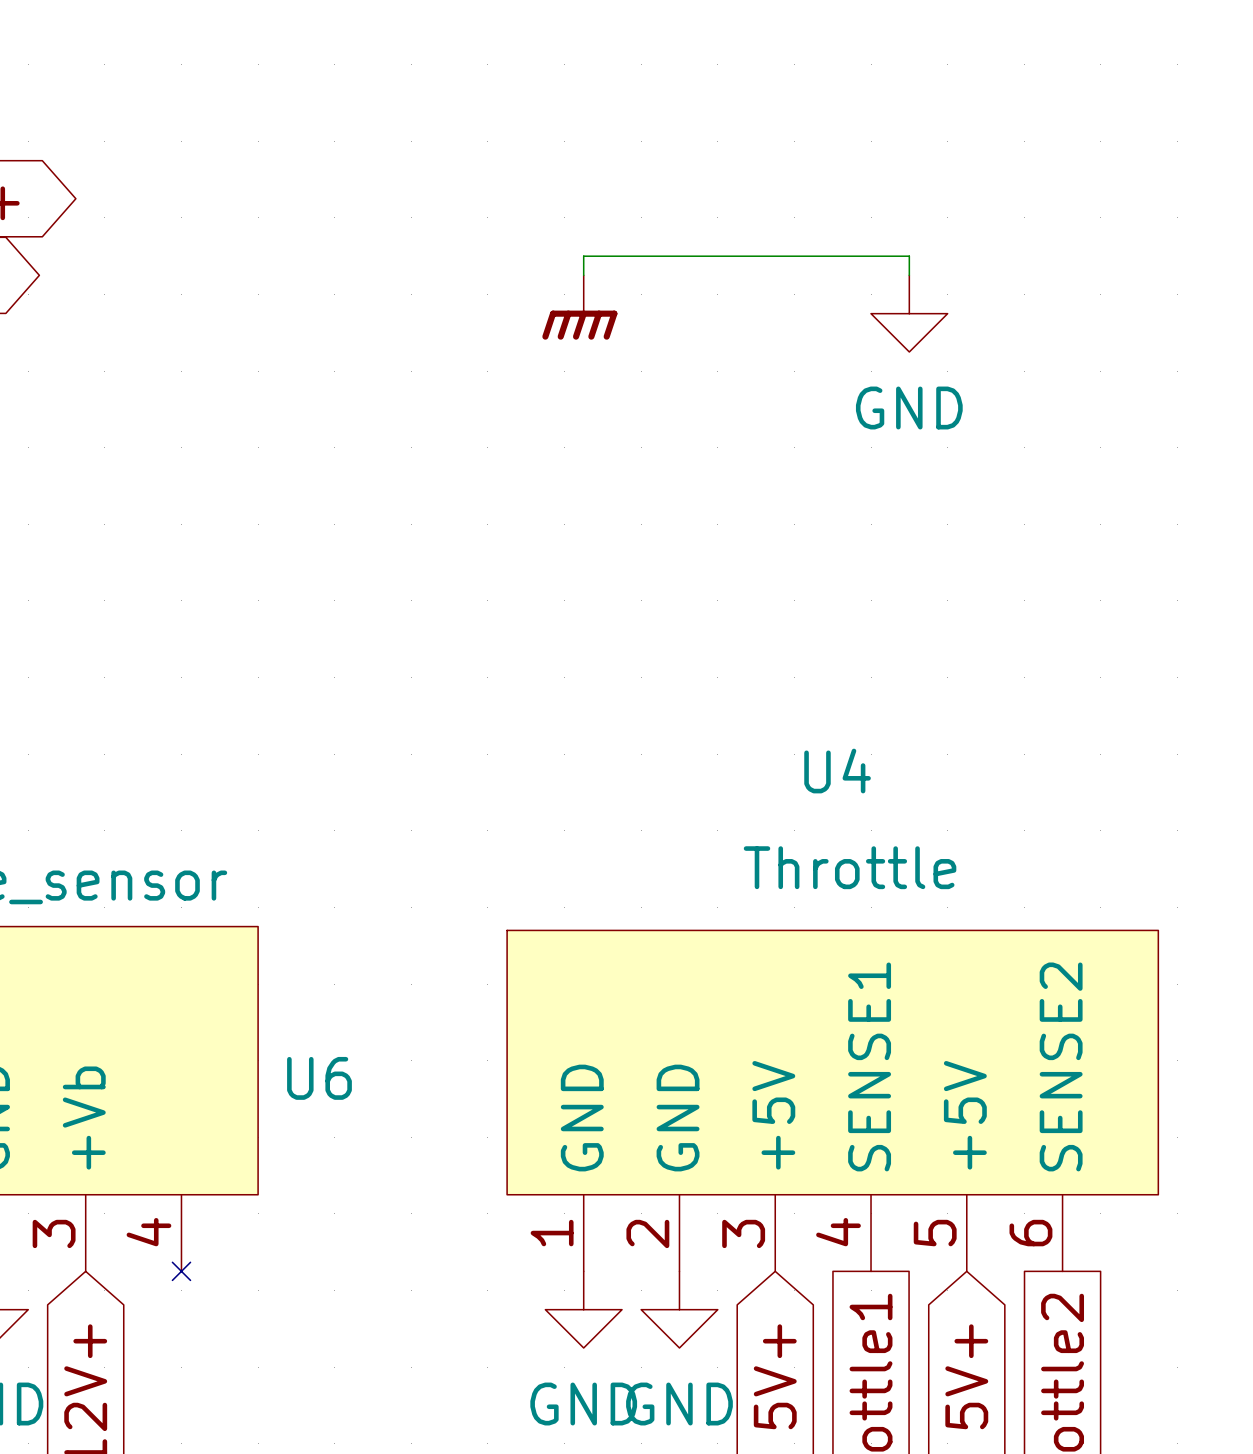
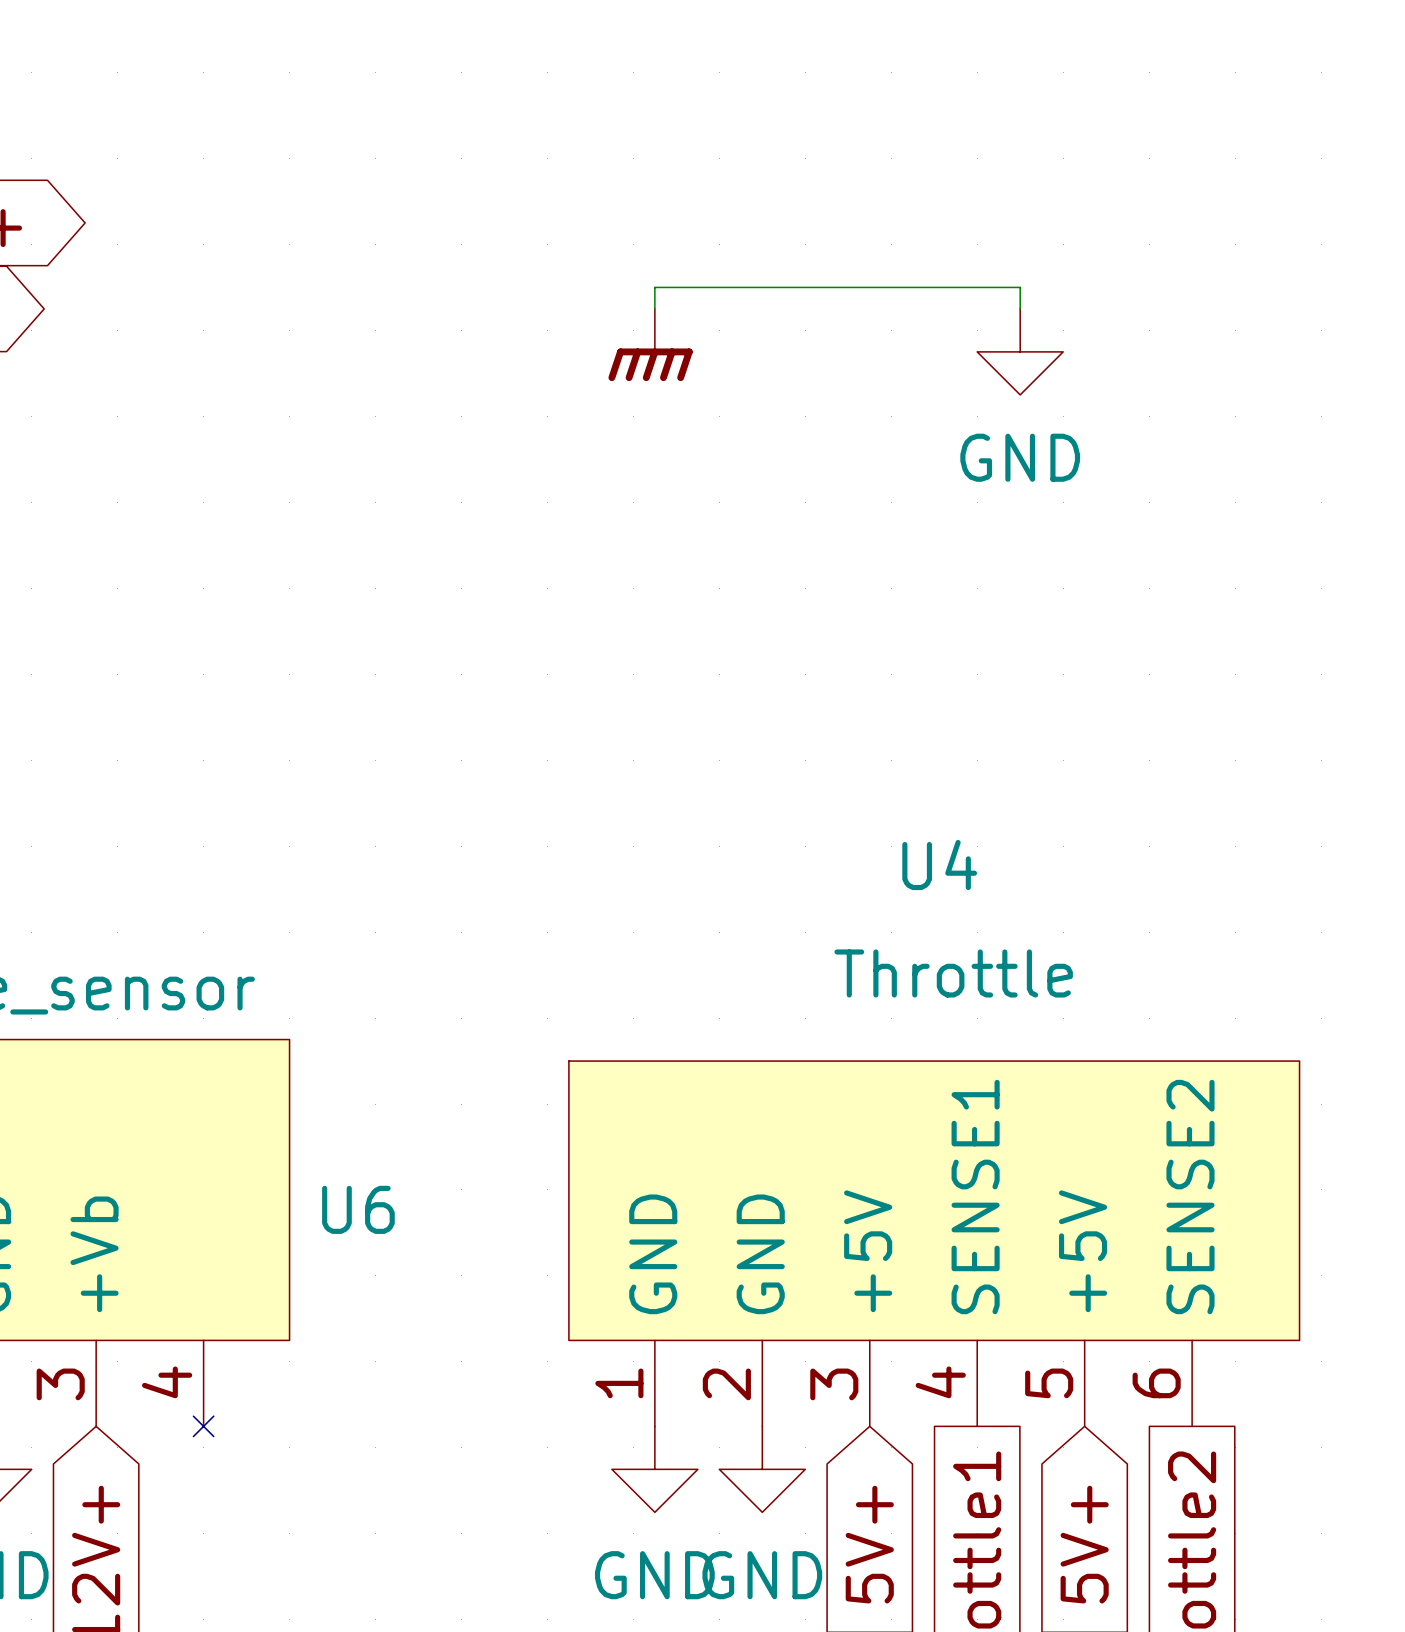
U4 symbol: [507, 930, 1159, 1272] -> [568, 1061, 1300, 1427]

